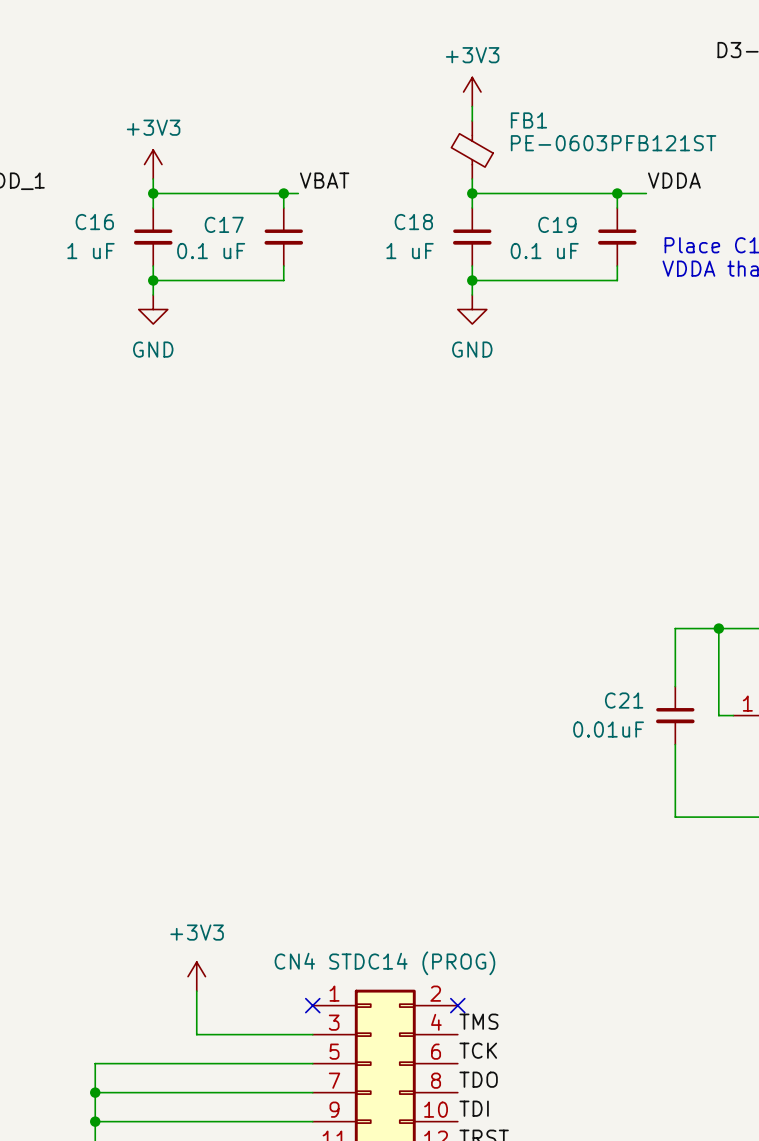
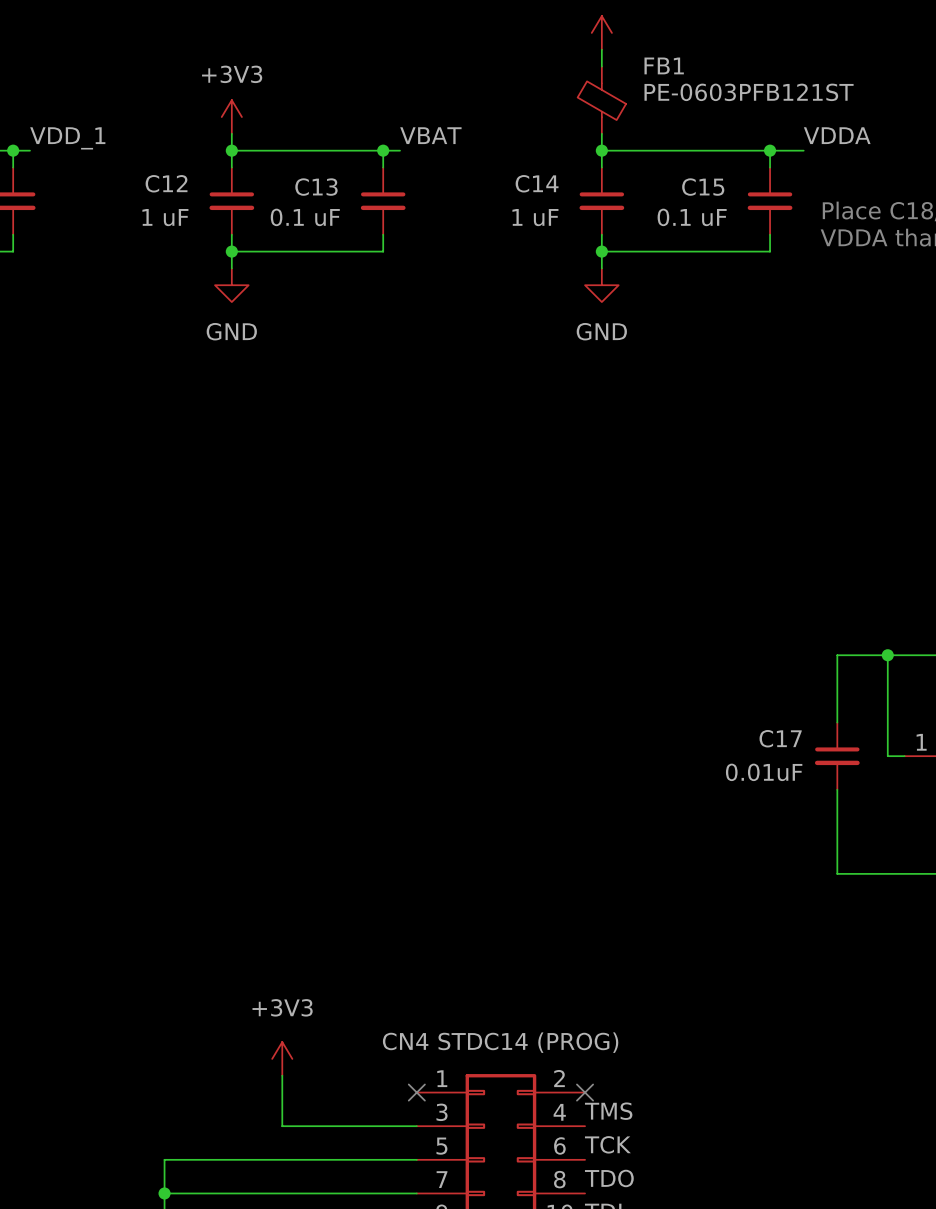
C16 name: C16 (94, 222) -> C12 (166, 183)
C18 name: C18 (413, 222) -> C14 (537, 183)
C17 name: C17 (224, 224) -> C13 (316, 187)
C19 name: C19 (557, 224) -> C15 (703, 187)
C21 name: C21 (624, 700) -> C17 (780, 738)

